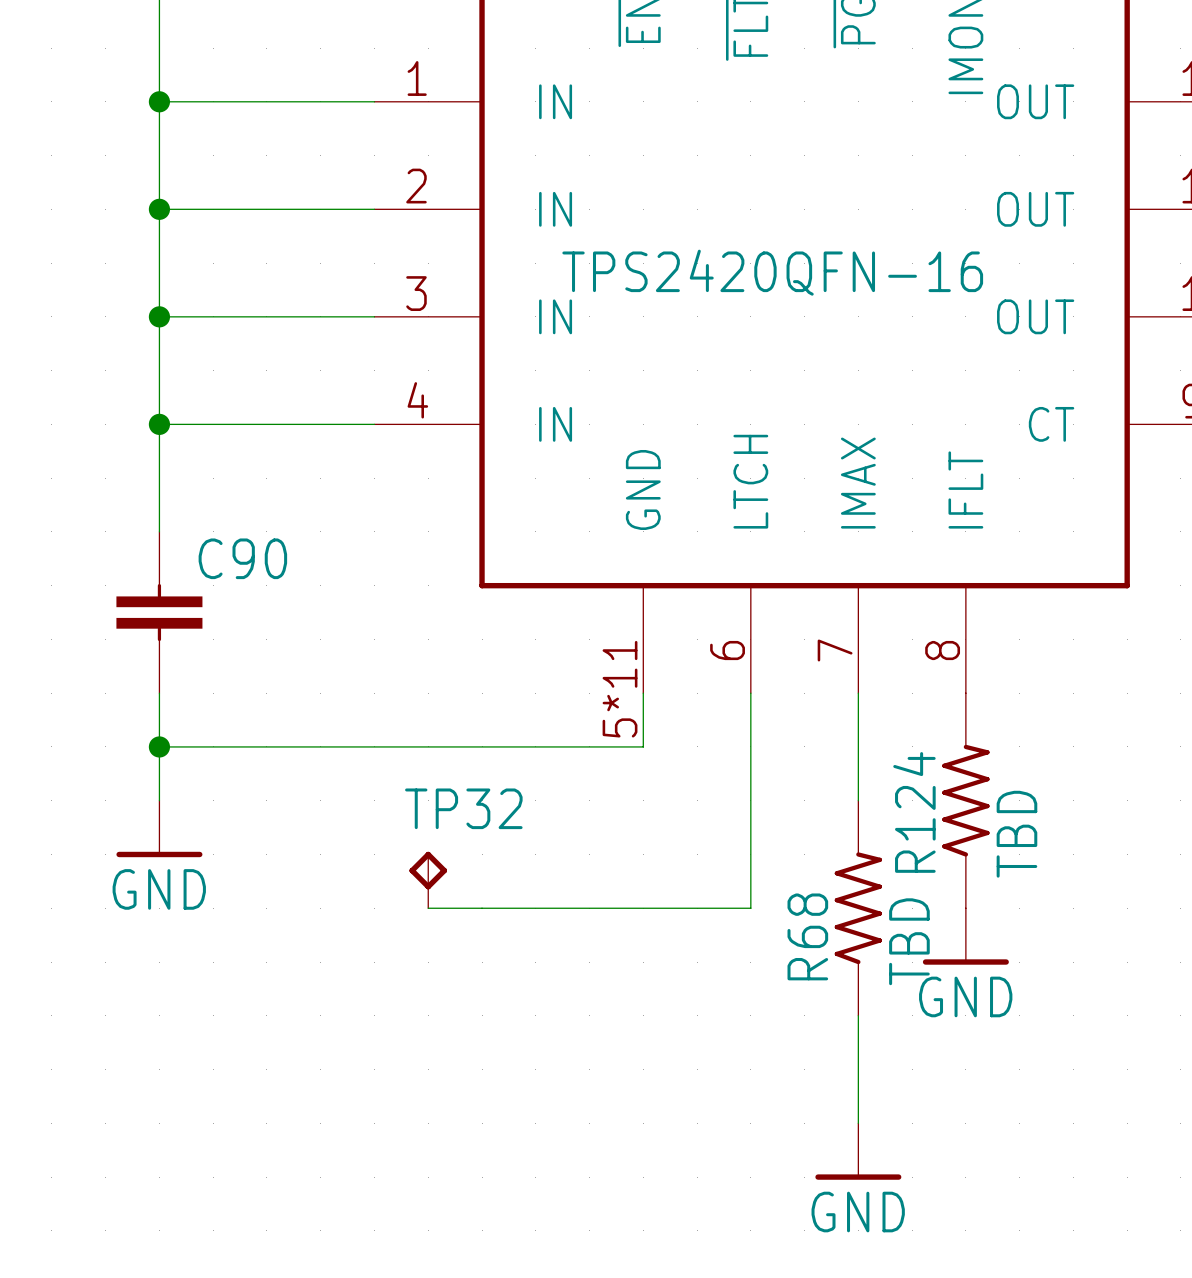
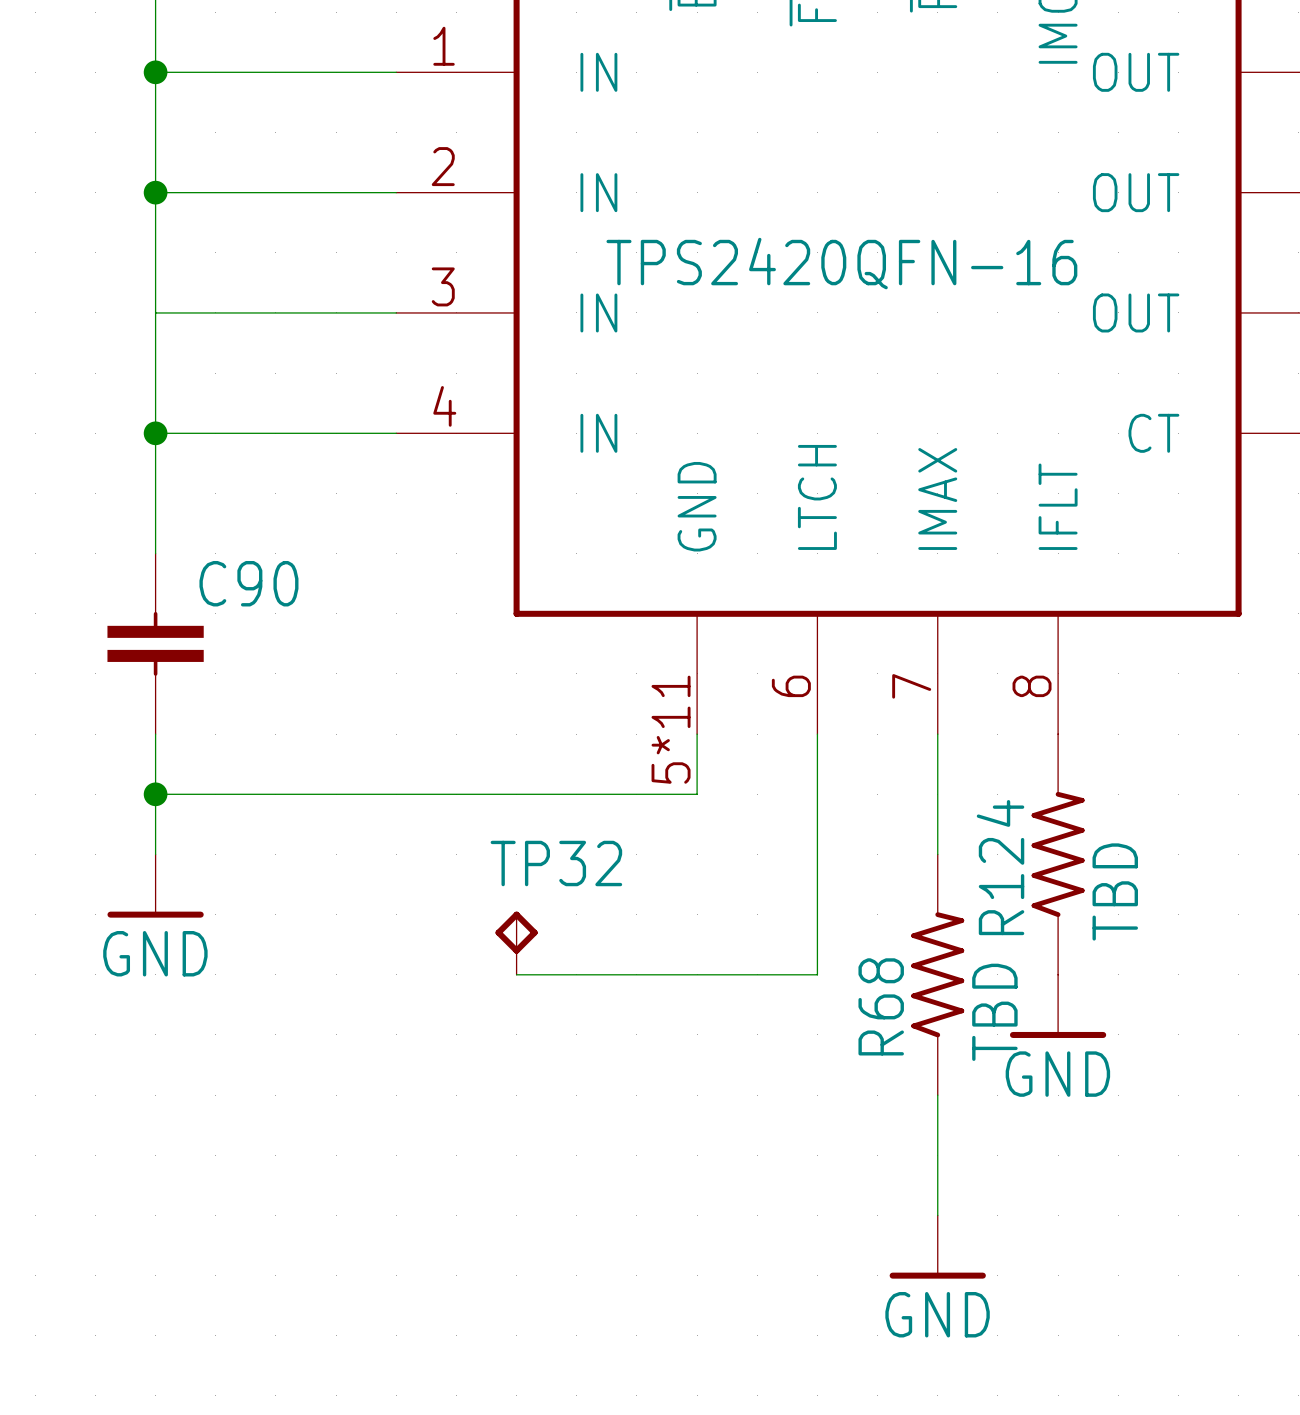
junction: (159, 316) -> none
TP32 position: (428, 880) -> (516, 943)
wire: (428, 908) (482, 908) -> none

